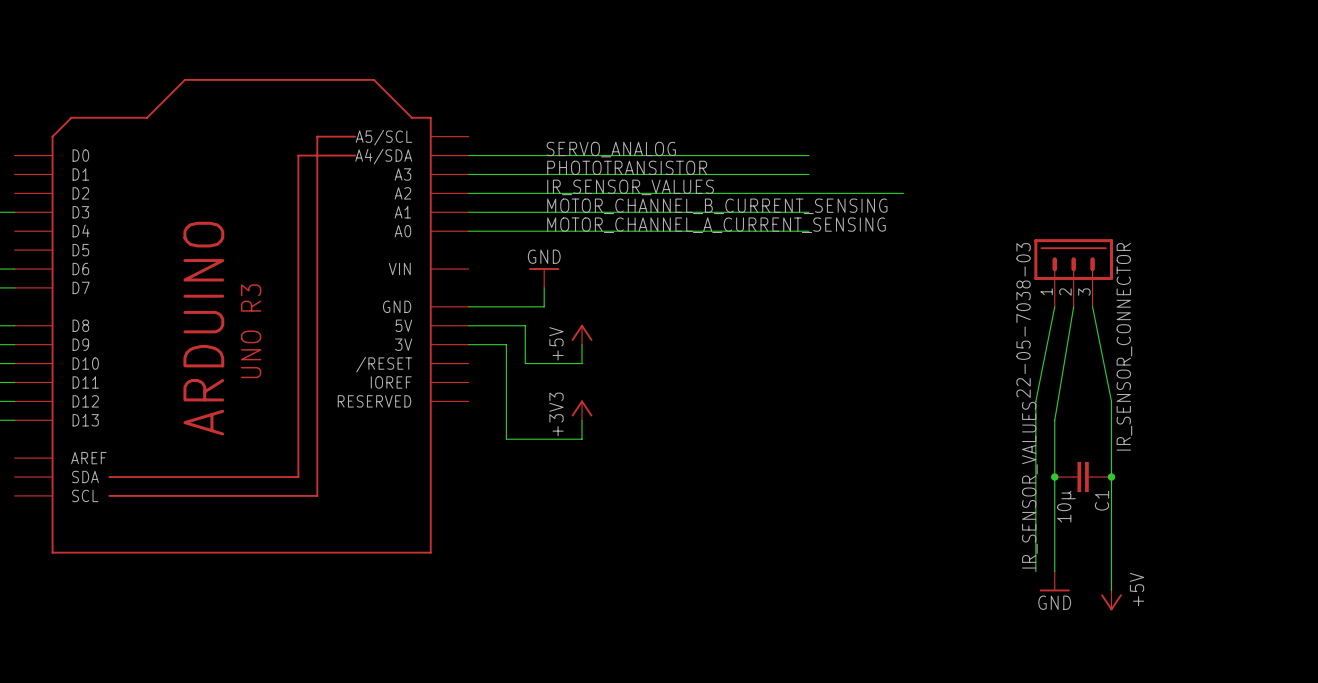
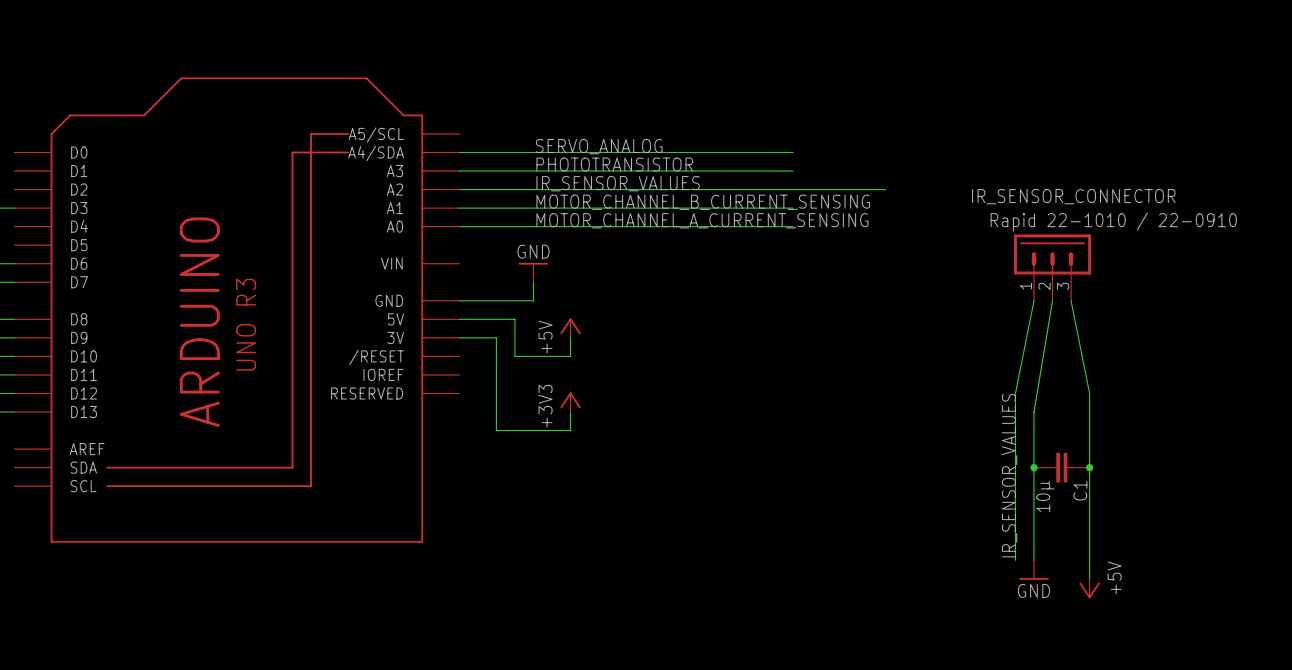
IR_SENSOR_CONNECTOR value: 22-05-7038-03 (1023, 320) -> Rapid 22-1010 / 22-0910 (1113, 222)
IR_SENSOR_CONNECTOR name rotation: 0° (1124, 346) -> 90° clockwise (1073, 196)

